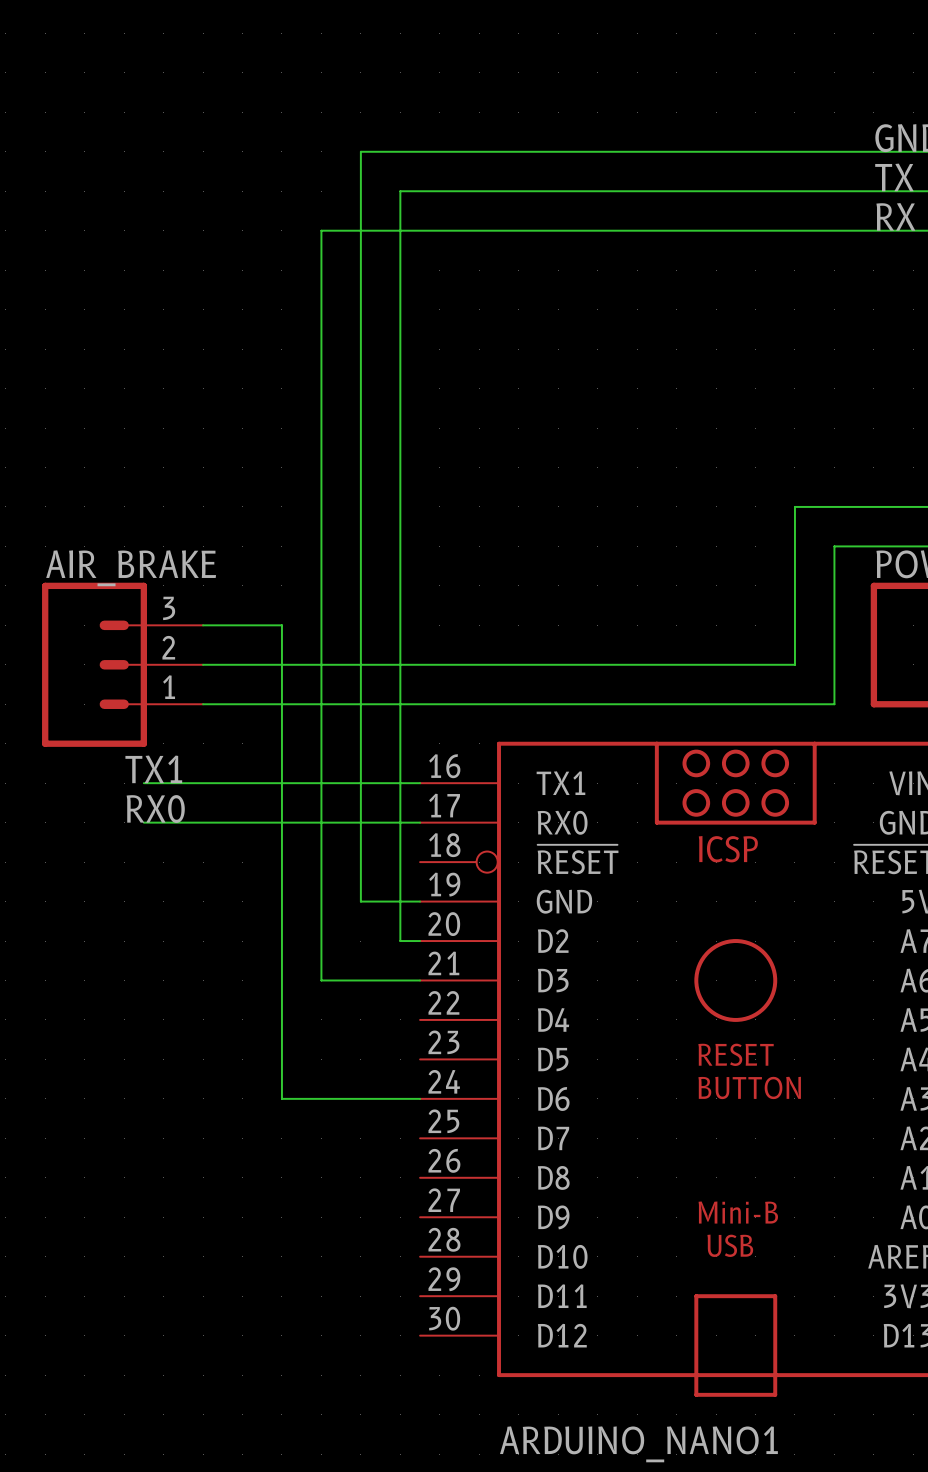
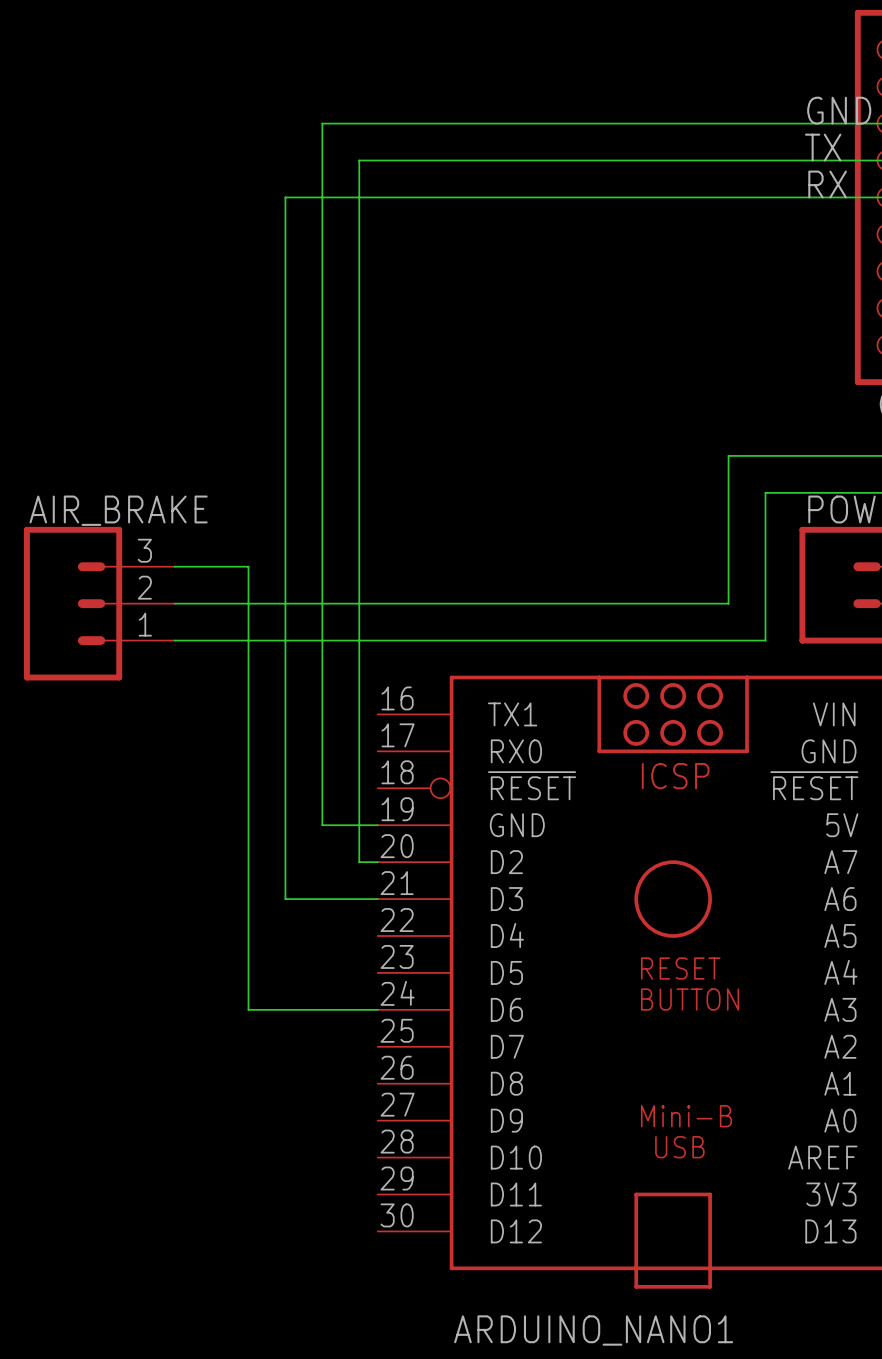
label: TX1 (153, 769) -> none
wire: (143, 783) (420, 783) -> none
label: RX0 (155, 808) -> none
wire: (143, 822) (420, 822) -> none

